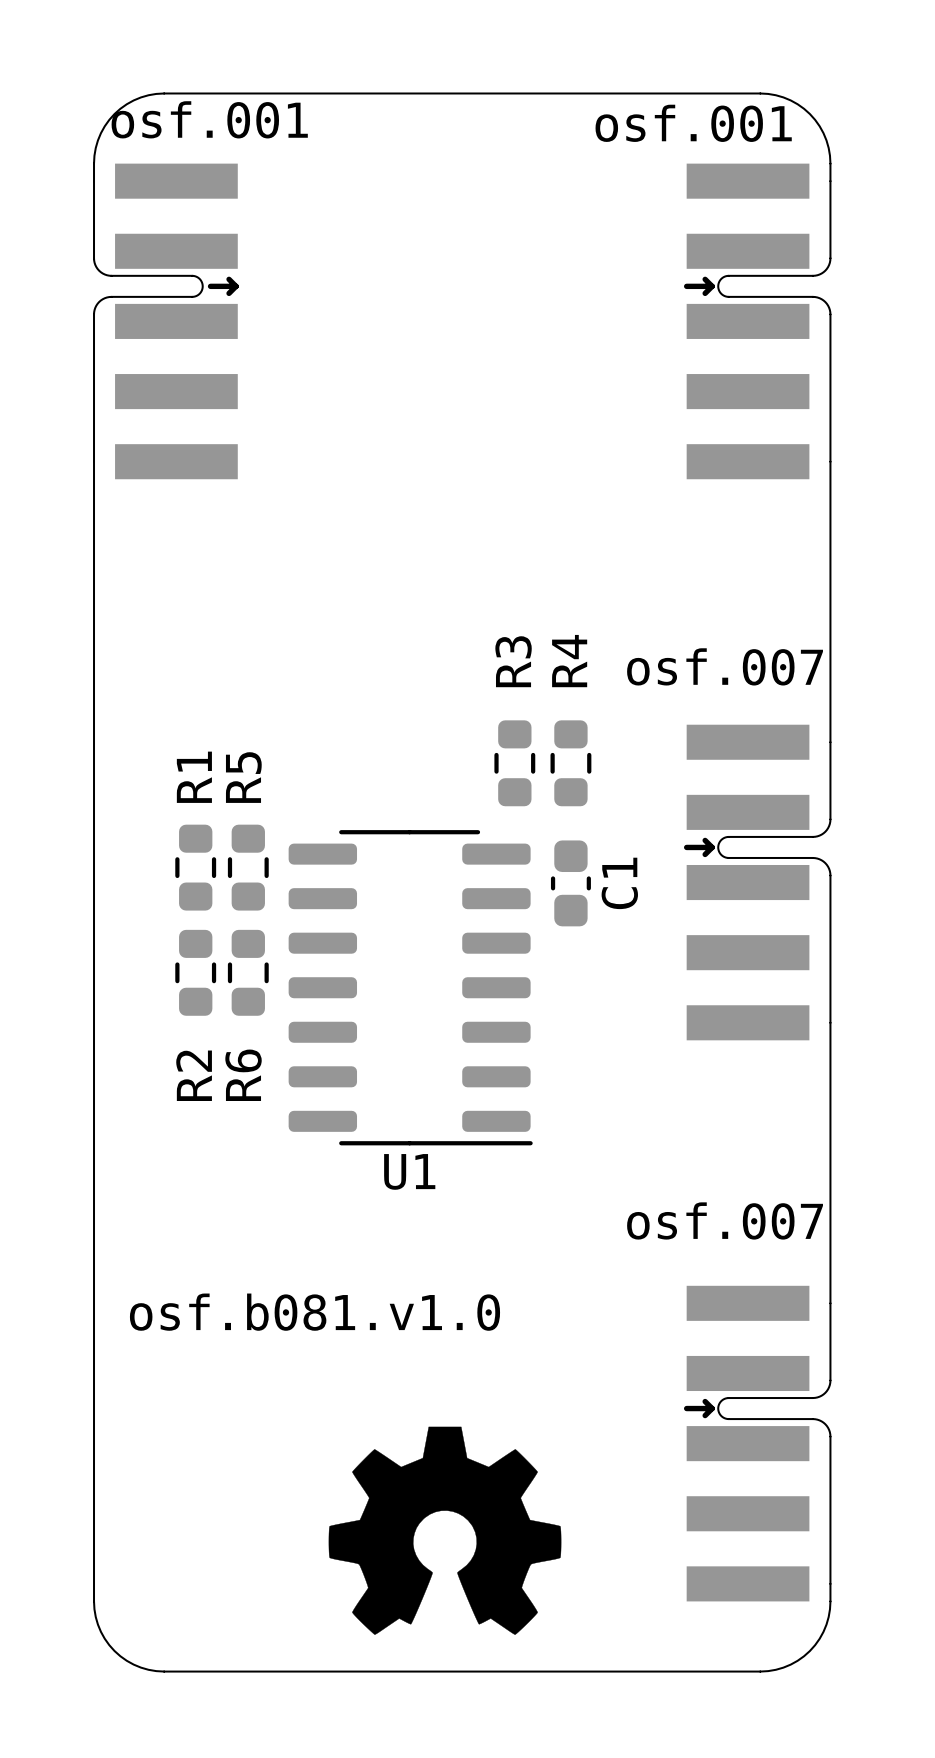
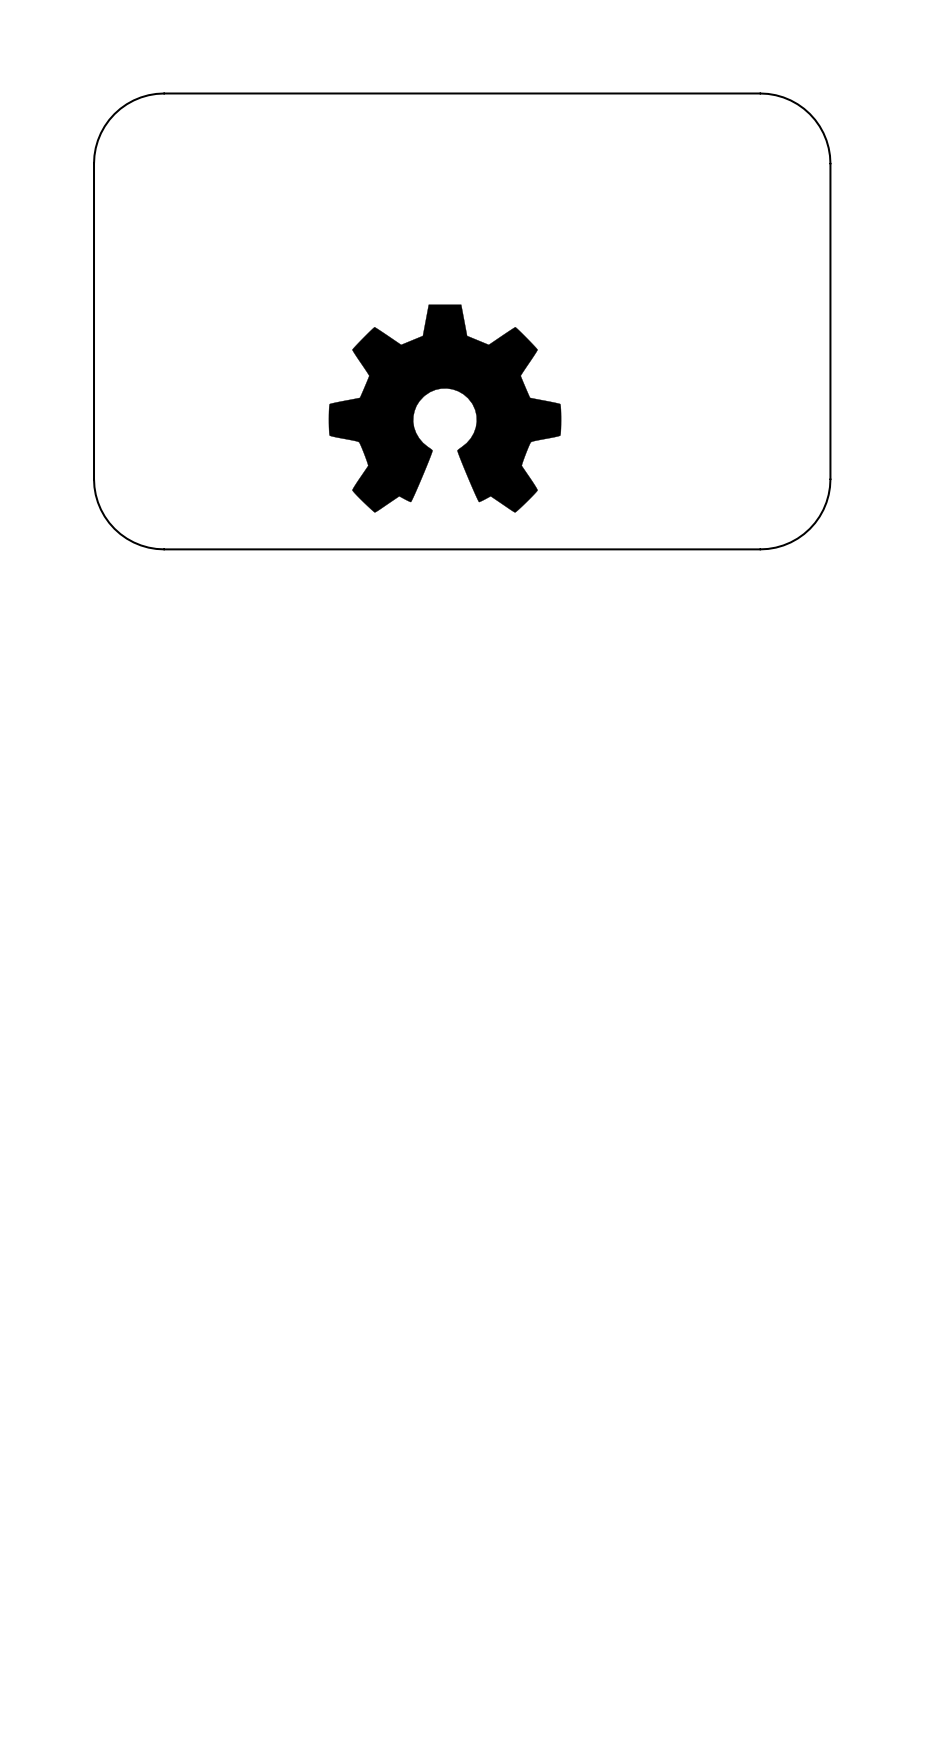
text: osf.001 (209, 119) -> none
text: osf.001 (693, 123) -> none
board edge: none -> (94, 181) (94, 461)
drawing: none -> [328, 304, 562, 513]
part: (165, 321) -> none
part: (757, 321) -> none
board edge: (94, 479) (94, 1601) (95, 1617) (104, 1638) (114, 1651) (133, 1664) (148, 1669) (164, 1671) (768, 1671) (783, 1667) (797, 1660) (815, 1645) (823, 1631) (828, 1617) (830, 1583) -> none
board edge: (830, 479) (830, 742) -> (830, 479) (826, 502) (819, 516) (809, 528) (797, 538) (783, 545) (760, 549) (156, 548) (133, 542) (114, 528) (100, 509) (95, 494) (94, 479)
text: osf.007 (725, 666) -> none
R3: (514, 763) -> none
R4: (570, 763) -> none
R1: (195, 867) -> none
R5: (248, 867) -> none
part: (757, 882) -> none
C1: (570, 883) -> none
R2: (195, 972) -> none
R6: (248, 972) -> none
U1: (410, 987) -> none
board edge: (830, 1022) (830, 1303) -> (830, 181) (830, 461)
text: osf.007 (725, 1220) -> none
text: osf.b081.v1.0 (314, 1312) -> none
drawing: [328, 1426, 562, 1635] -> none
part: (757, 1443) -> none

